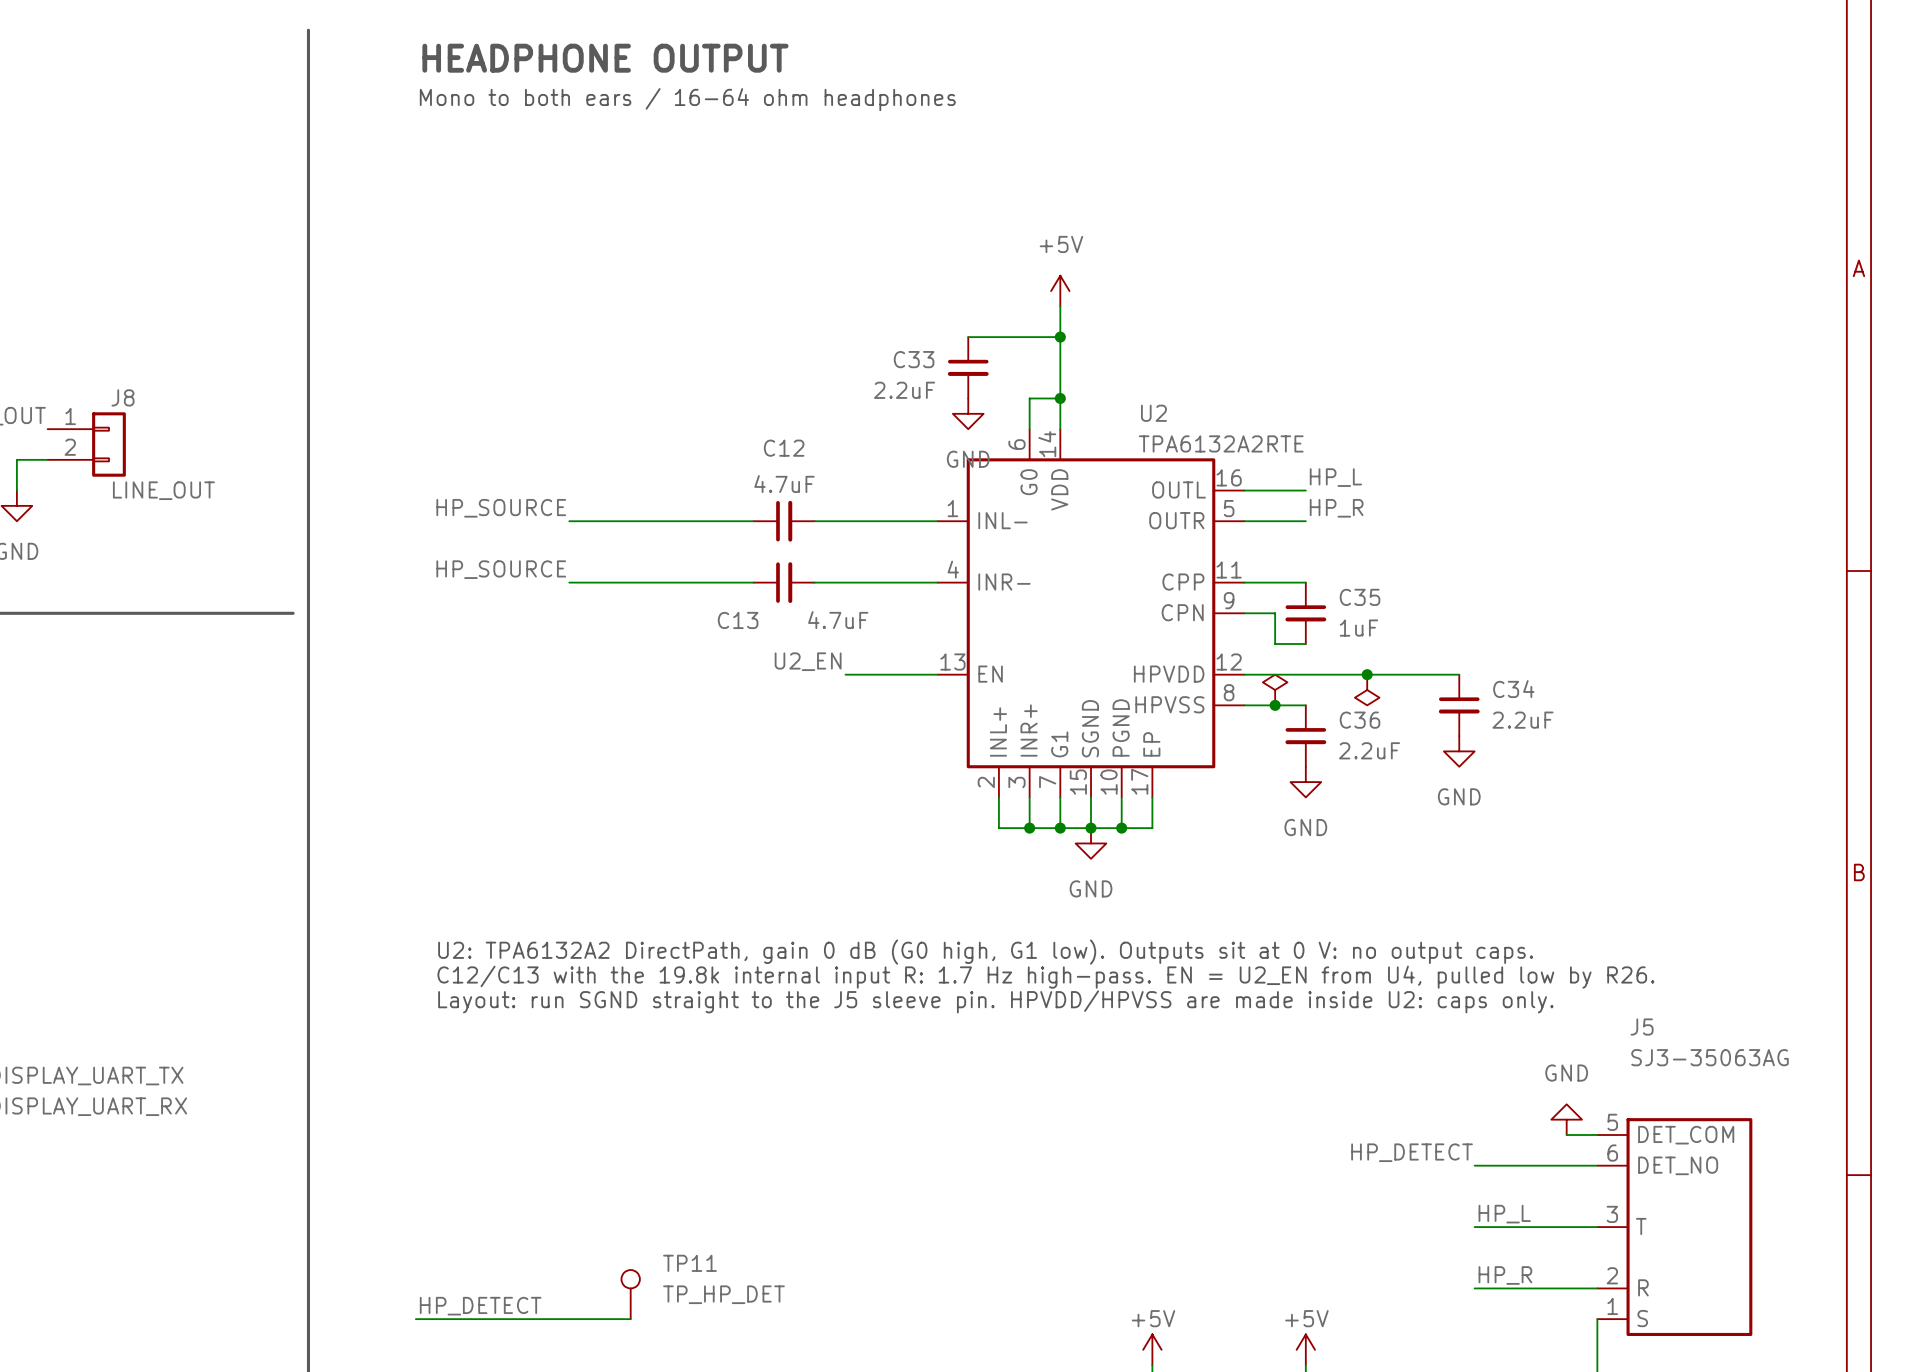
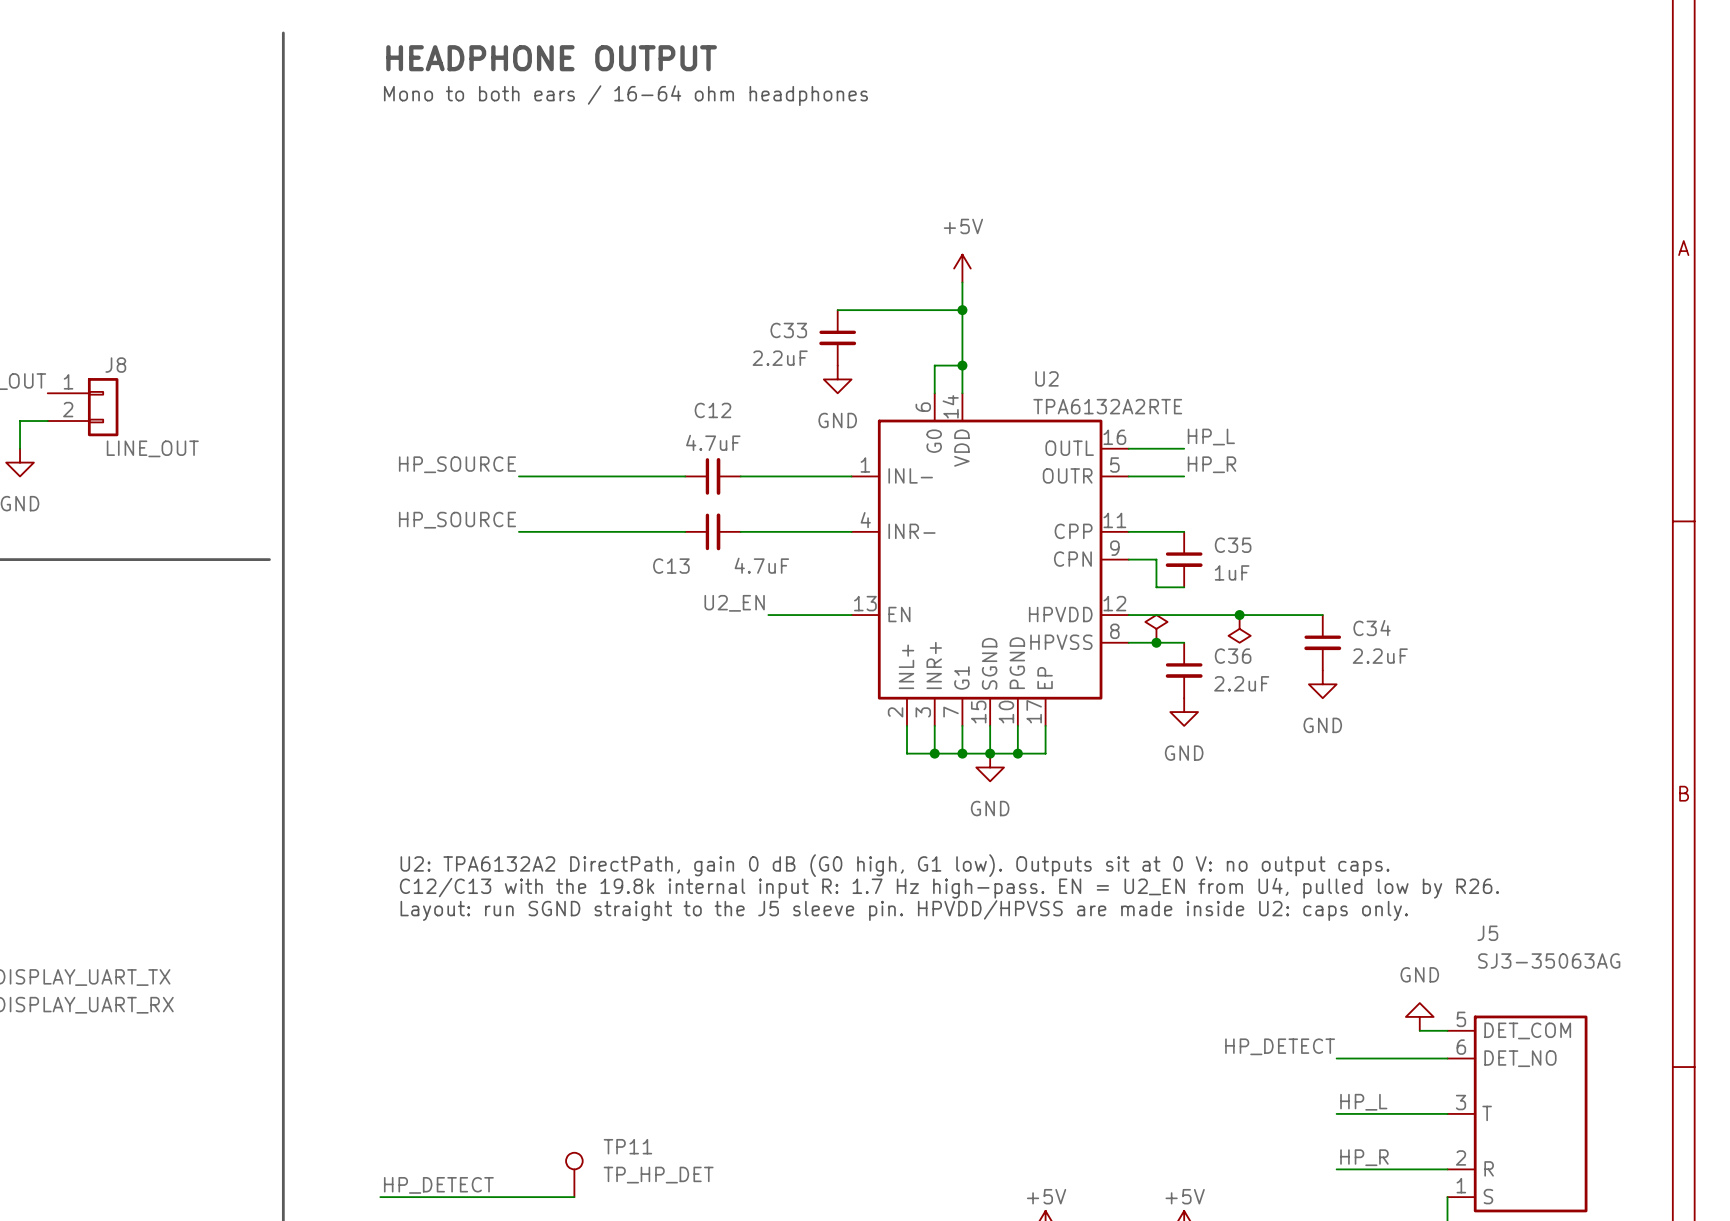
wire: none -> (837, 310) (879, 310)
C33 position: (968, 367) -> (837, 337)
power symbol position: GND (968, 413) -> GND (837, 379)

